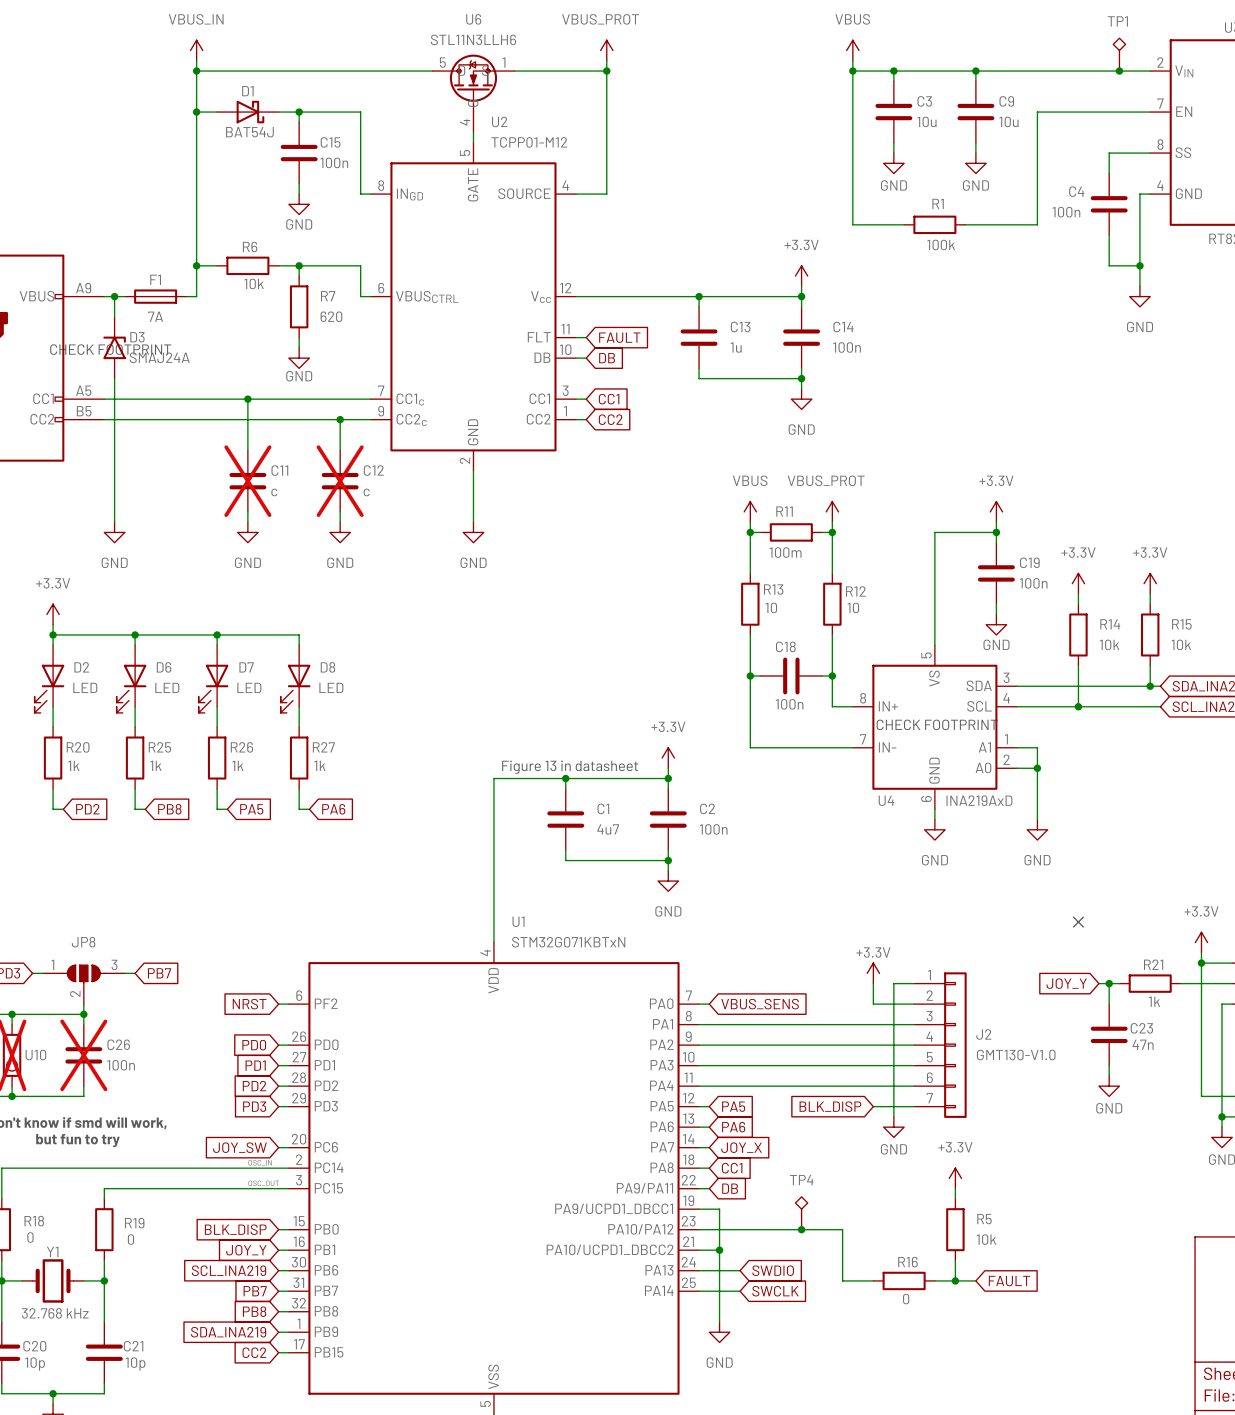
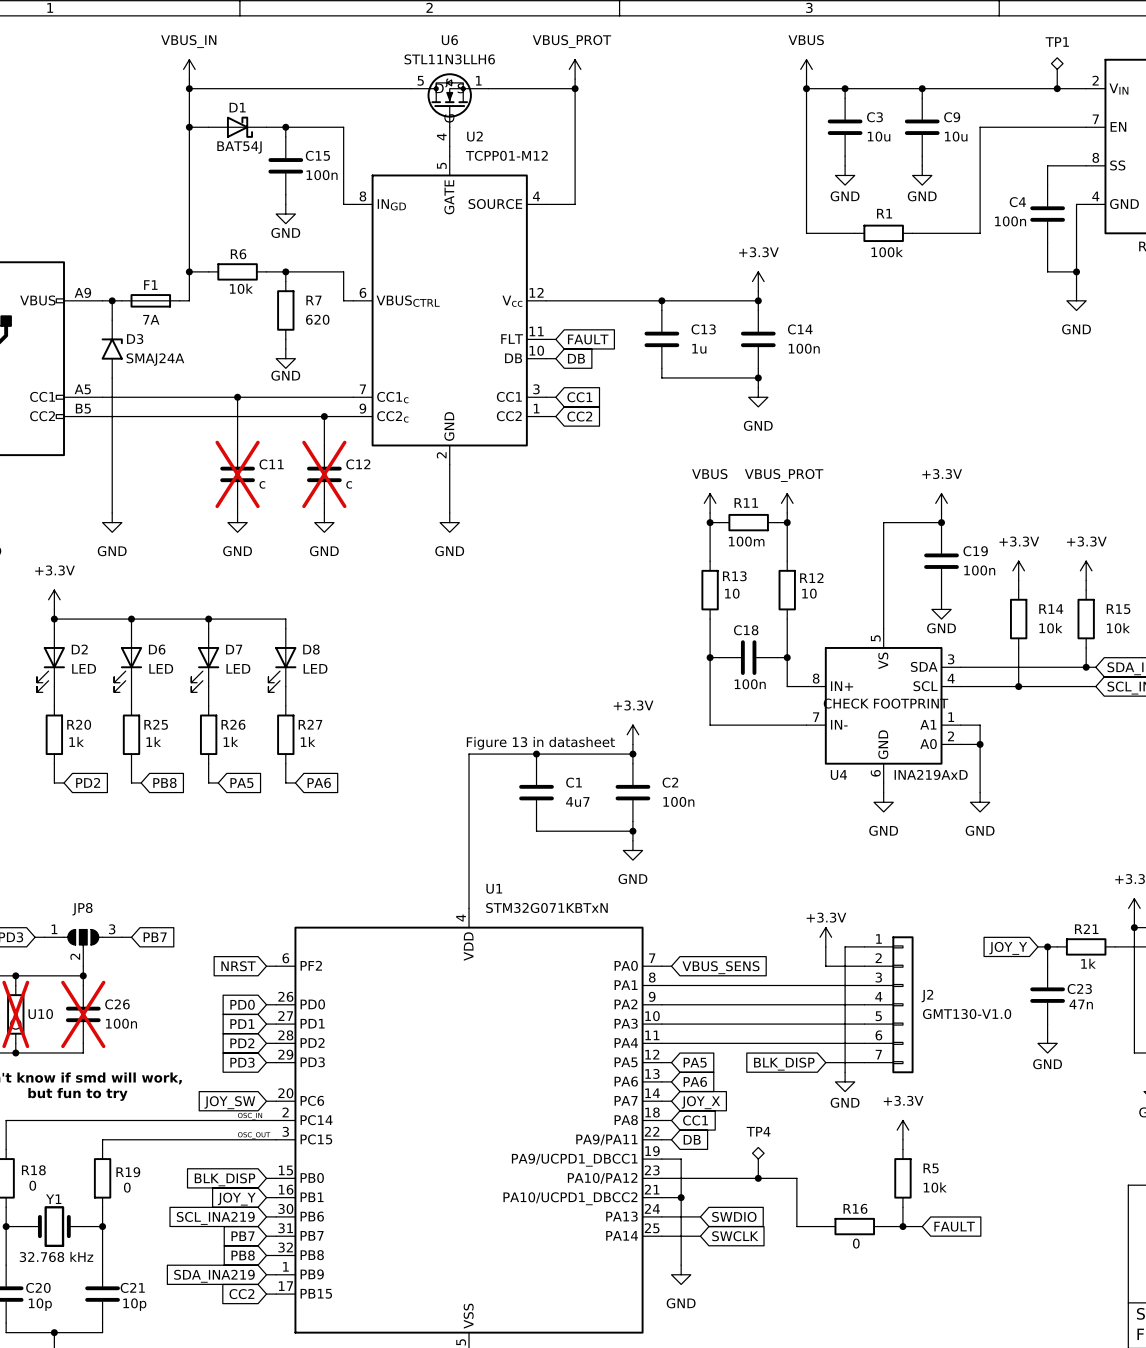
text: CHECK FOOTPRINT (110, 349) -> none
no-connect mark: (1078, 922) -> none

